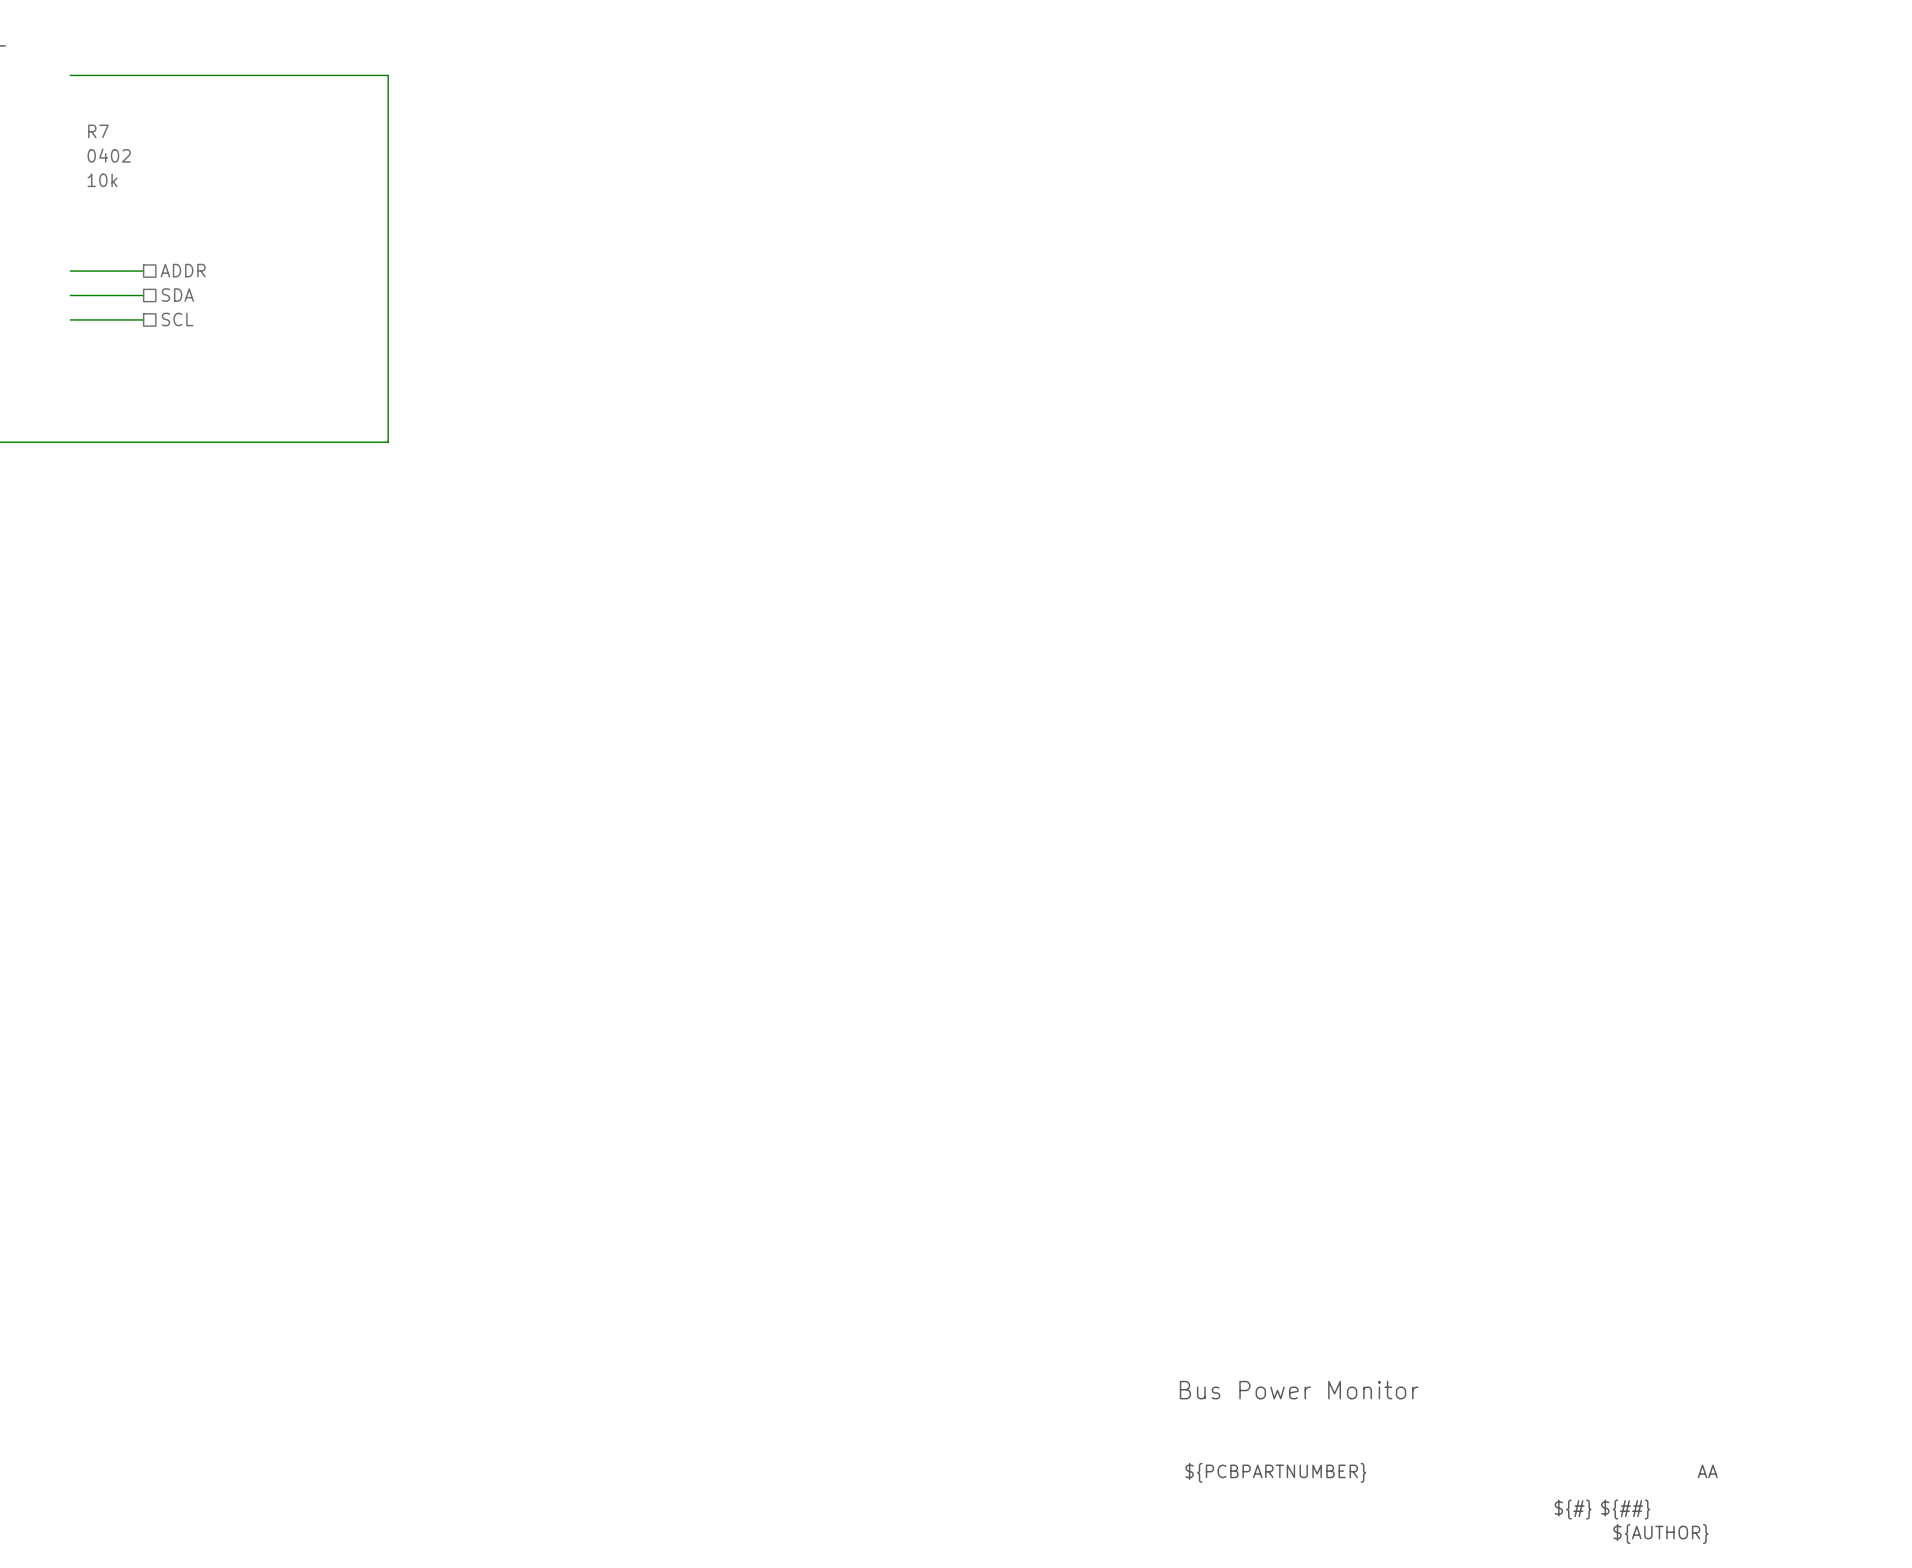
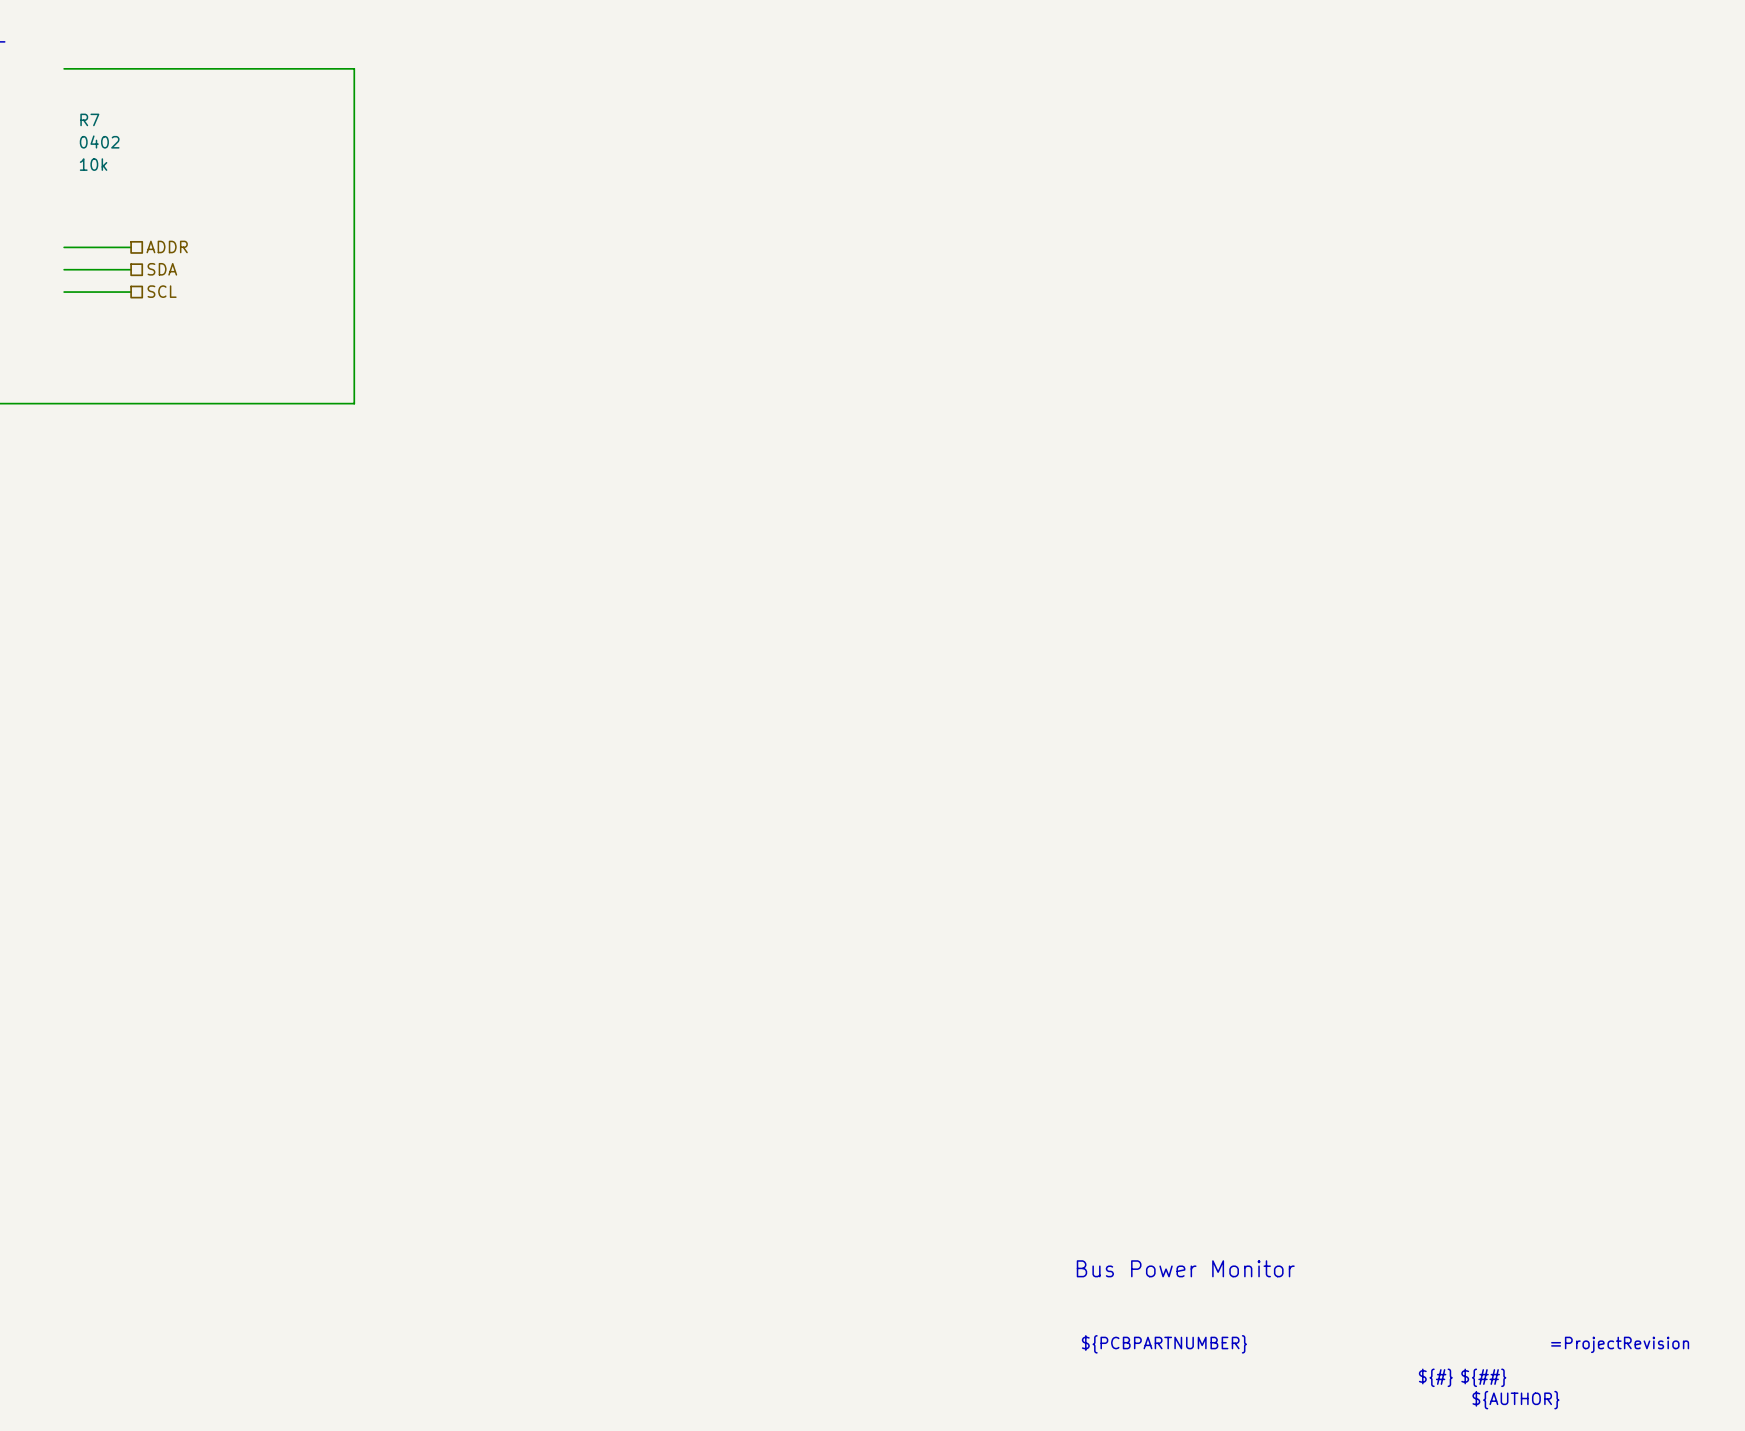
text: AA (1707, 1471) -> =ProjectRevision (1620, 1344)

